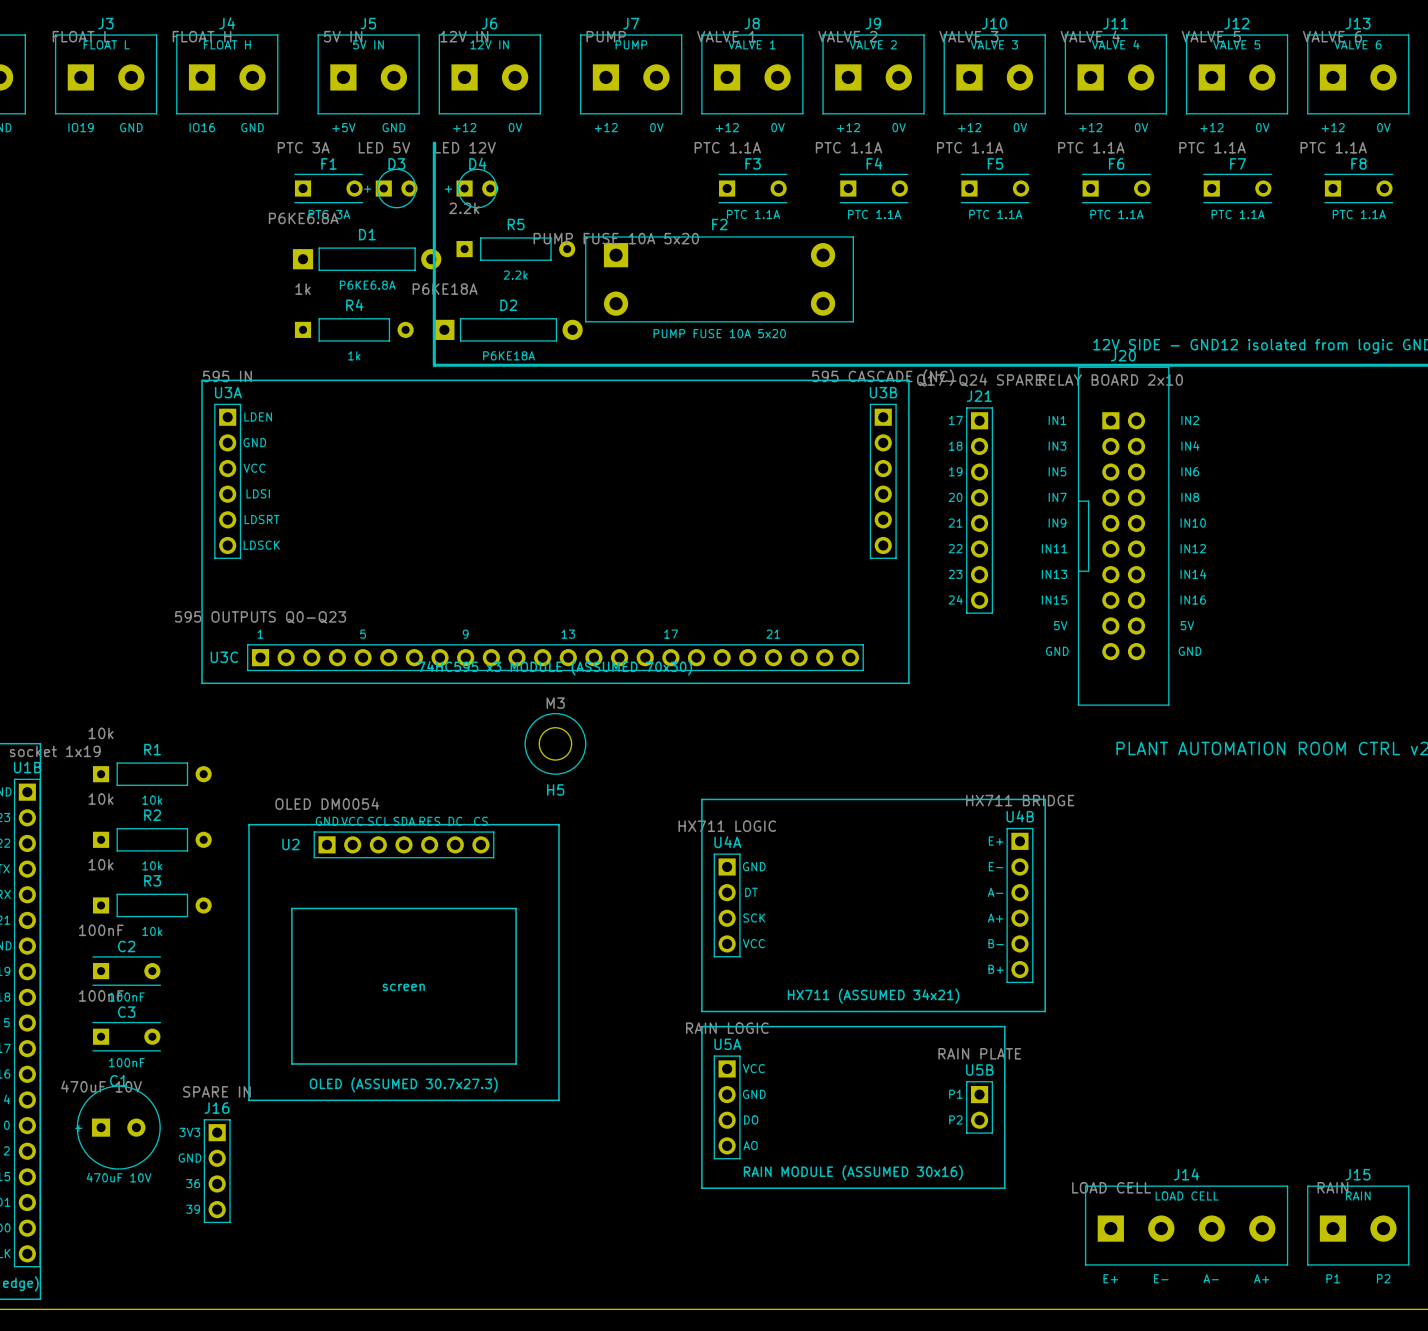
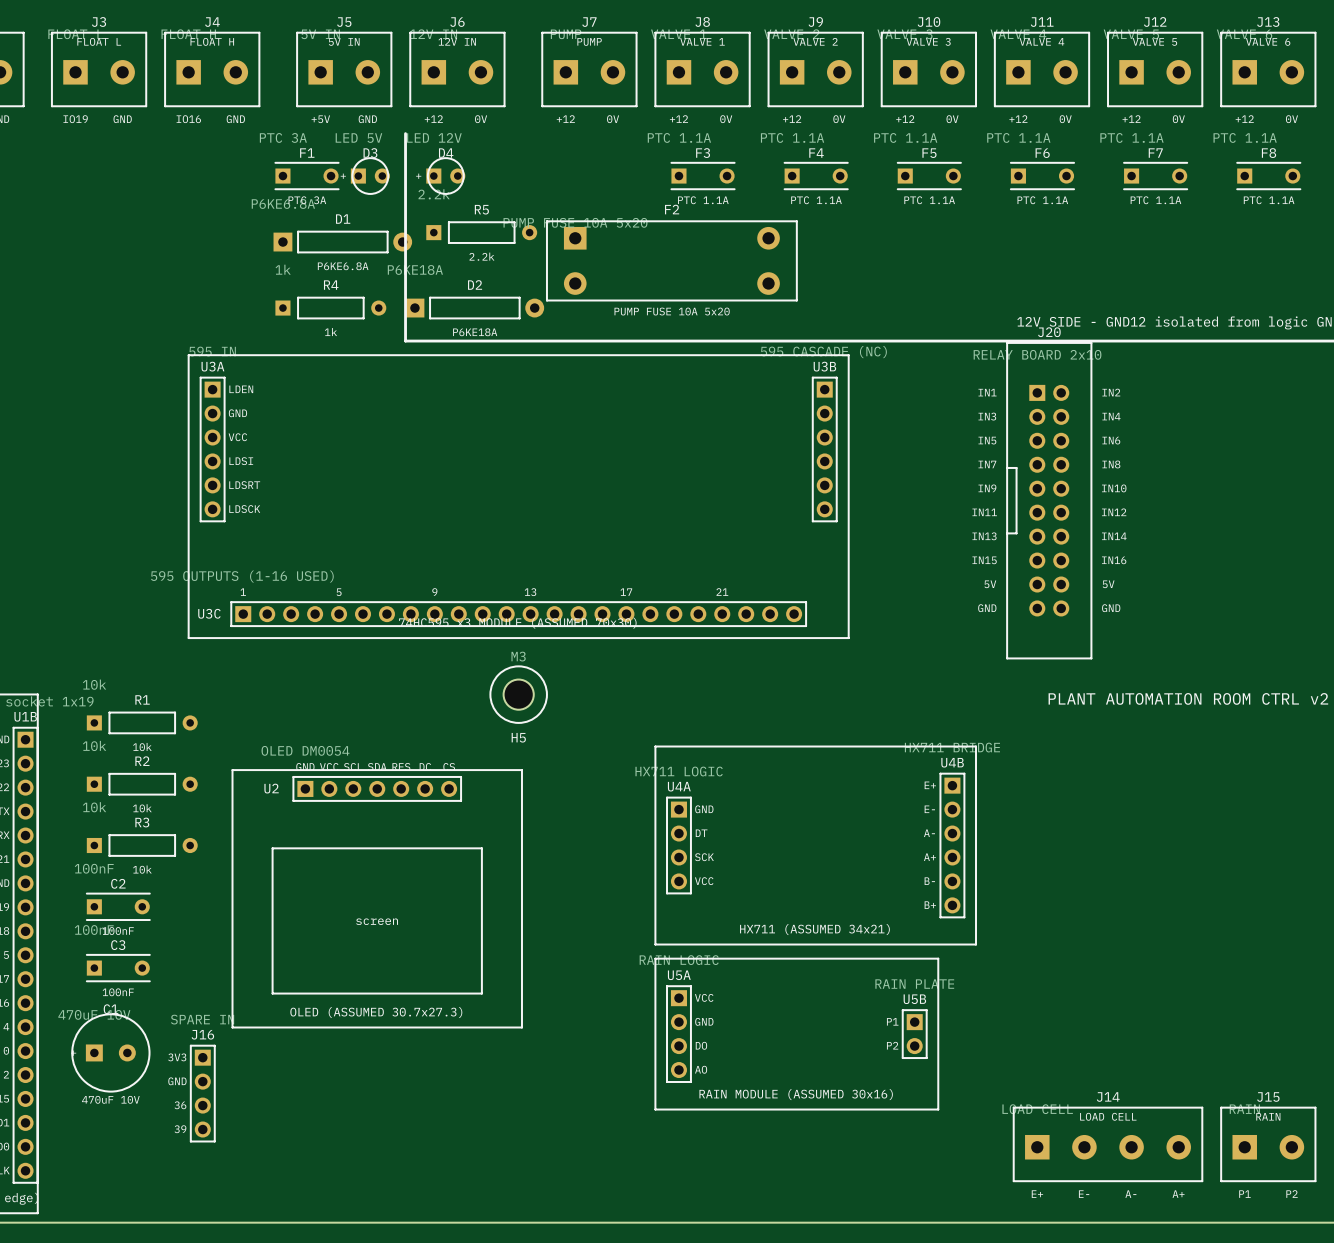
J21: Q17-Q24 SPARE (979, 510) -> none
U3C value: 595 OUTPUTS Q0-Q23 (260, 617) -> 595 OUTPUTS (1-16 USED) (242, 576)

